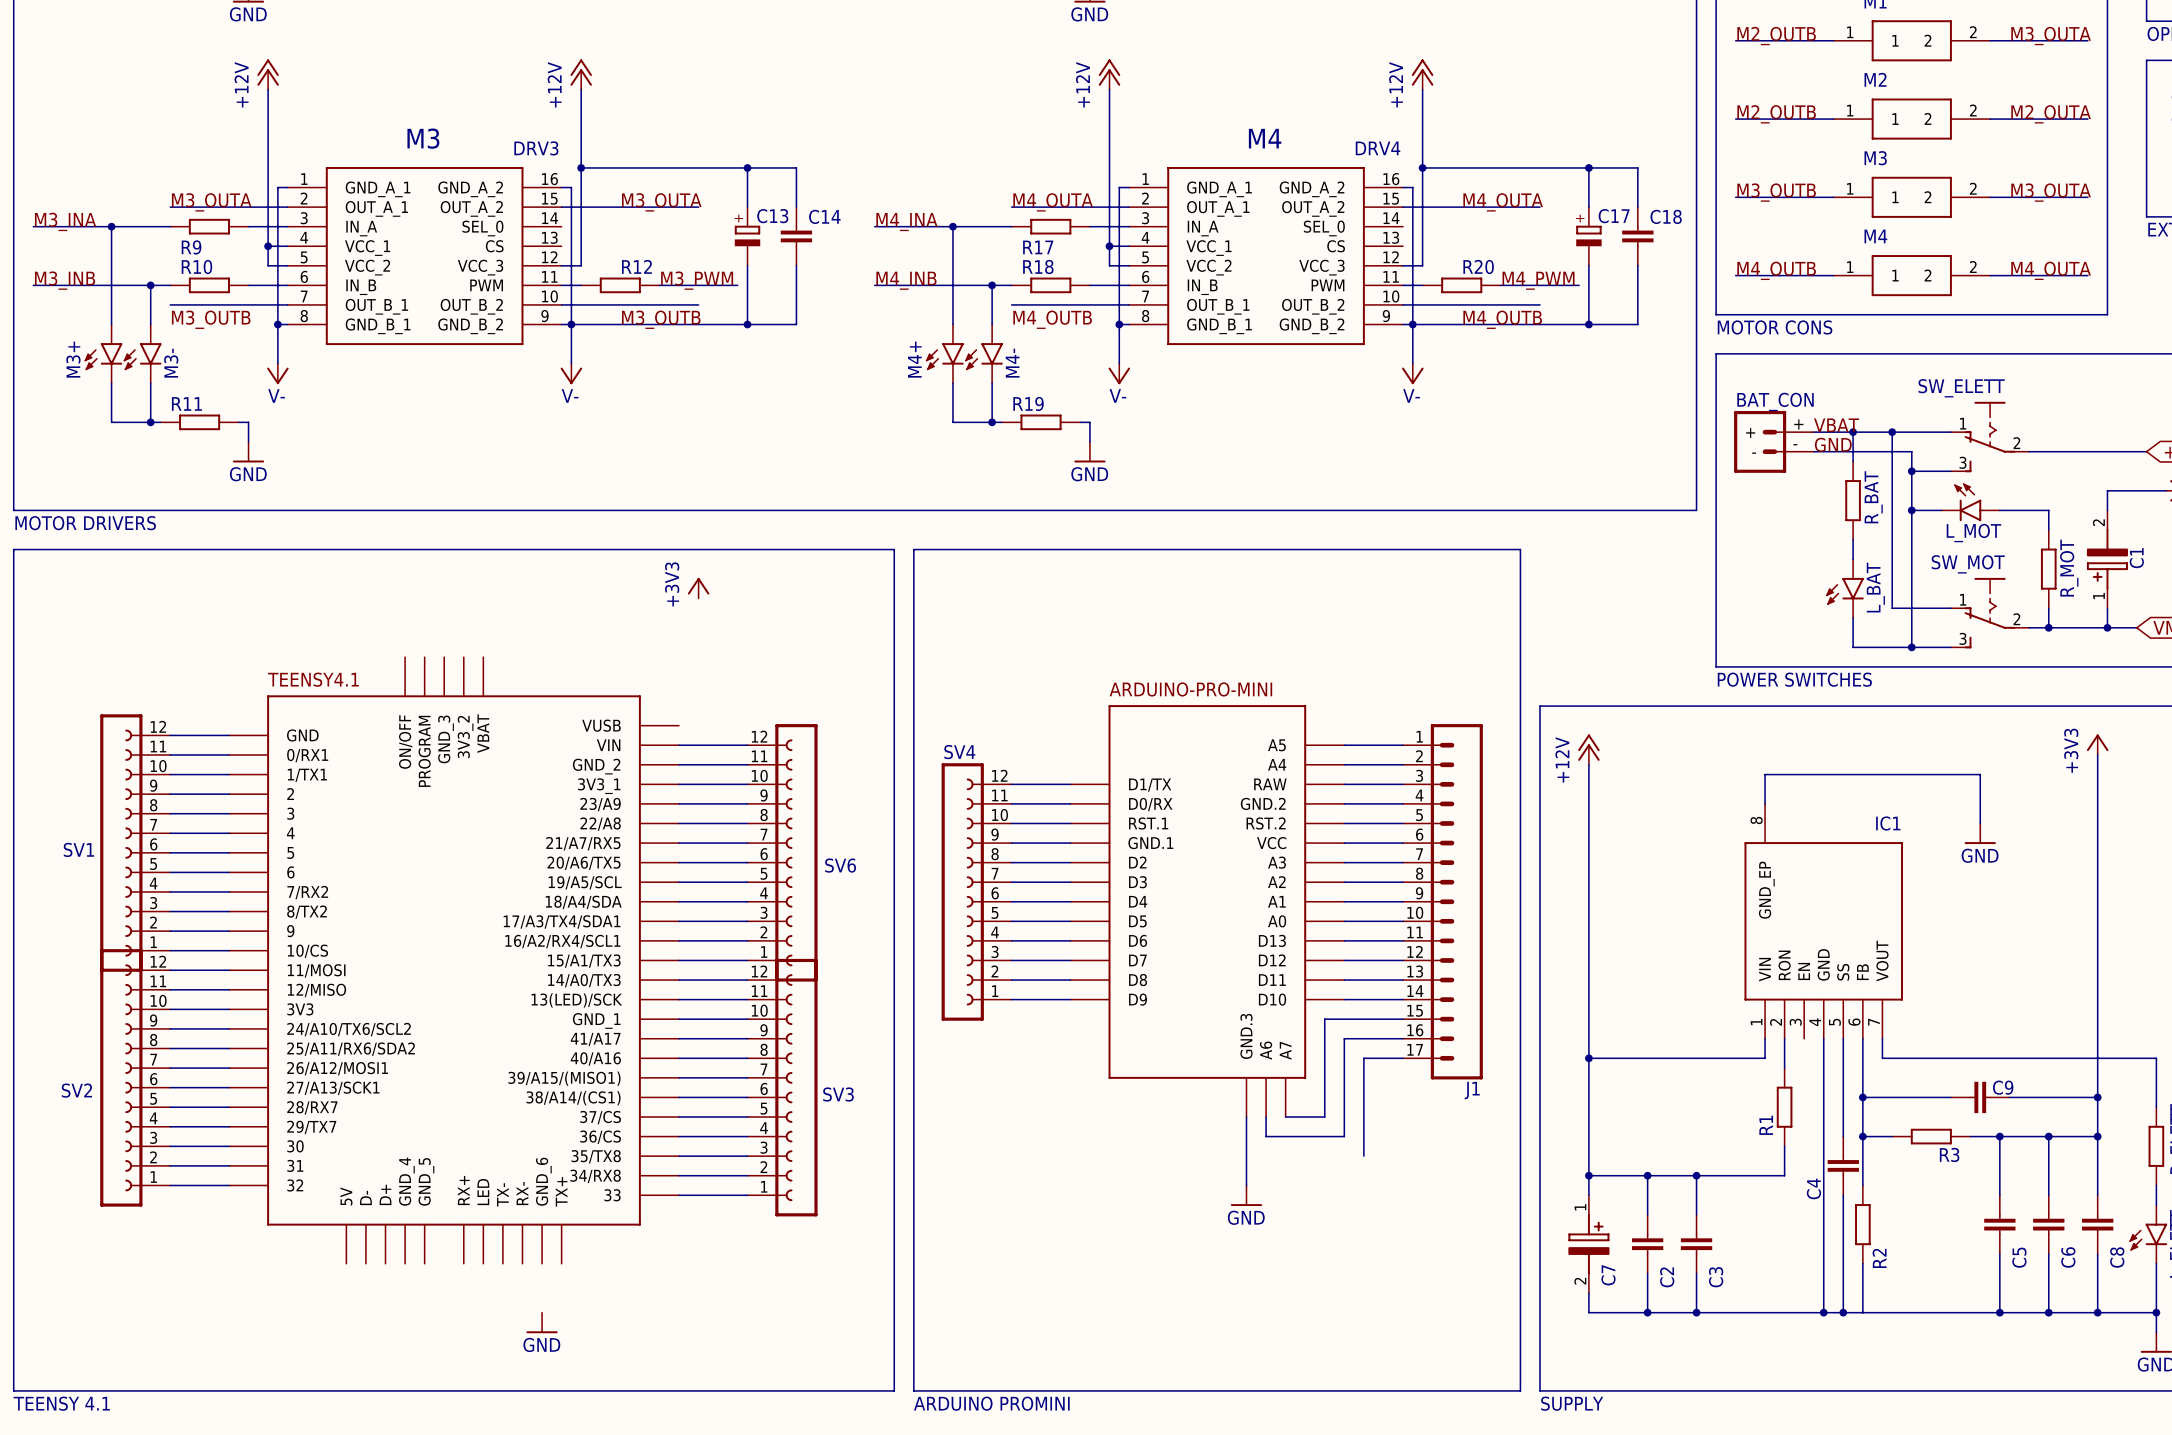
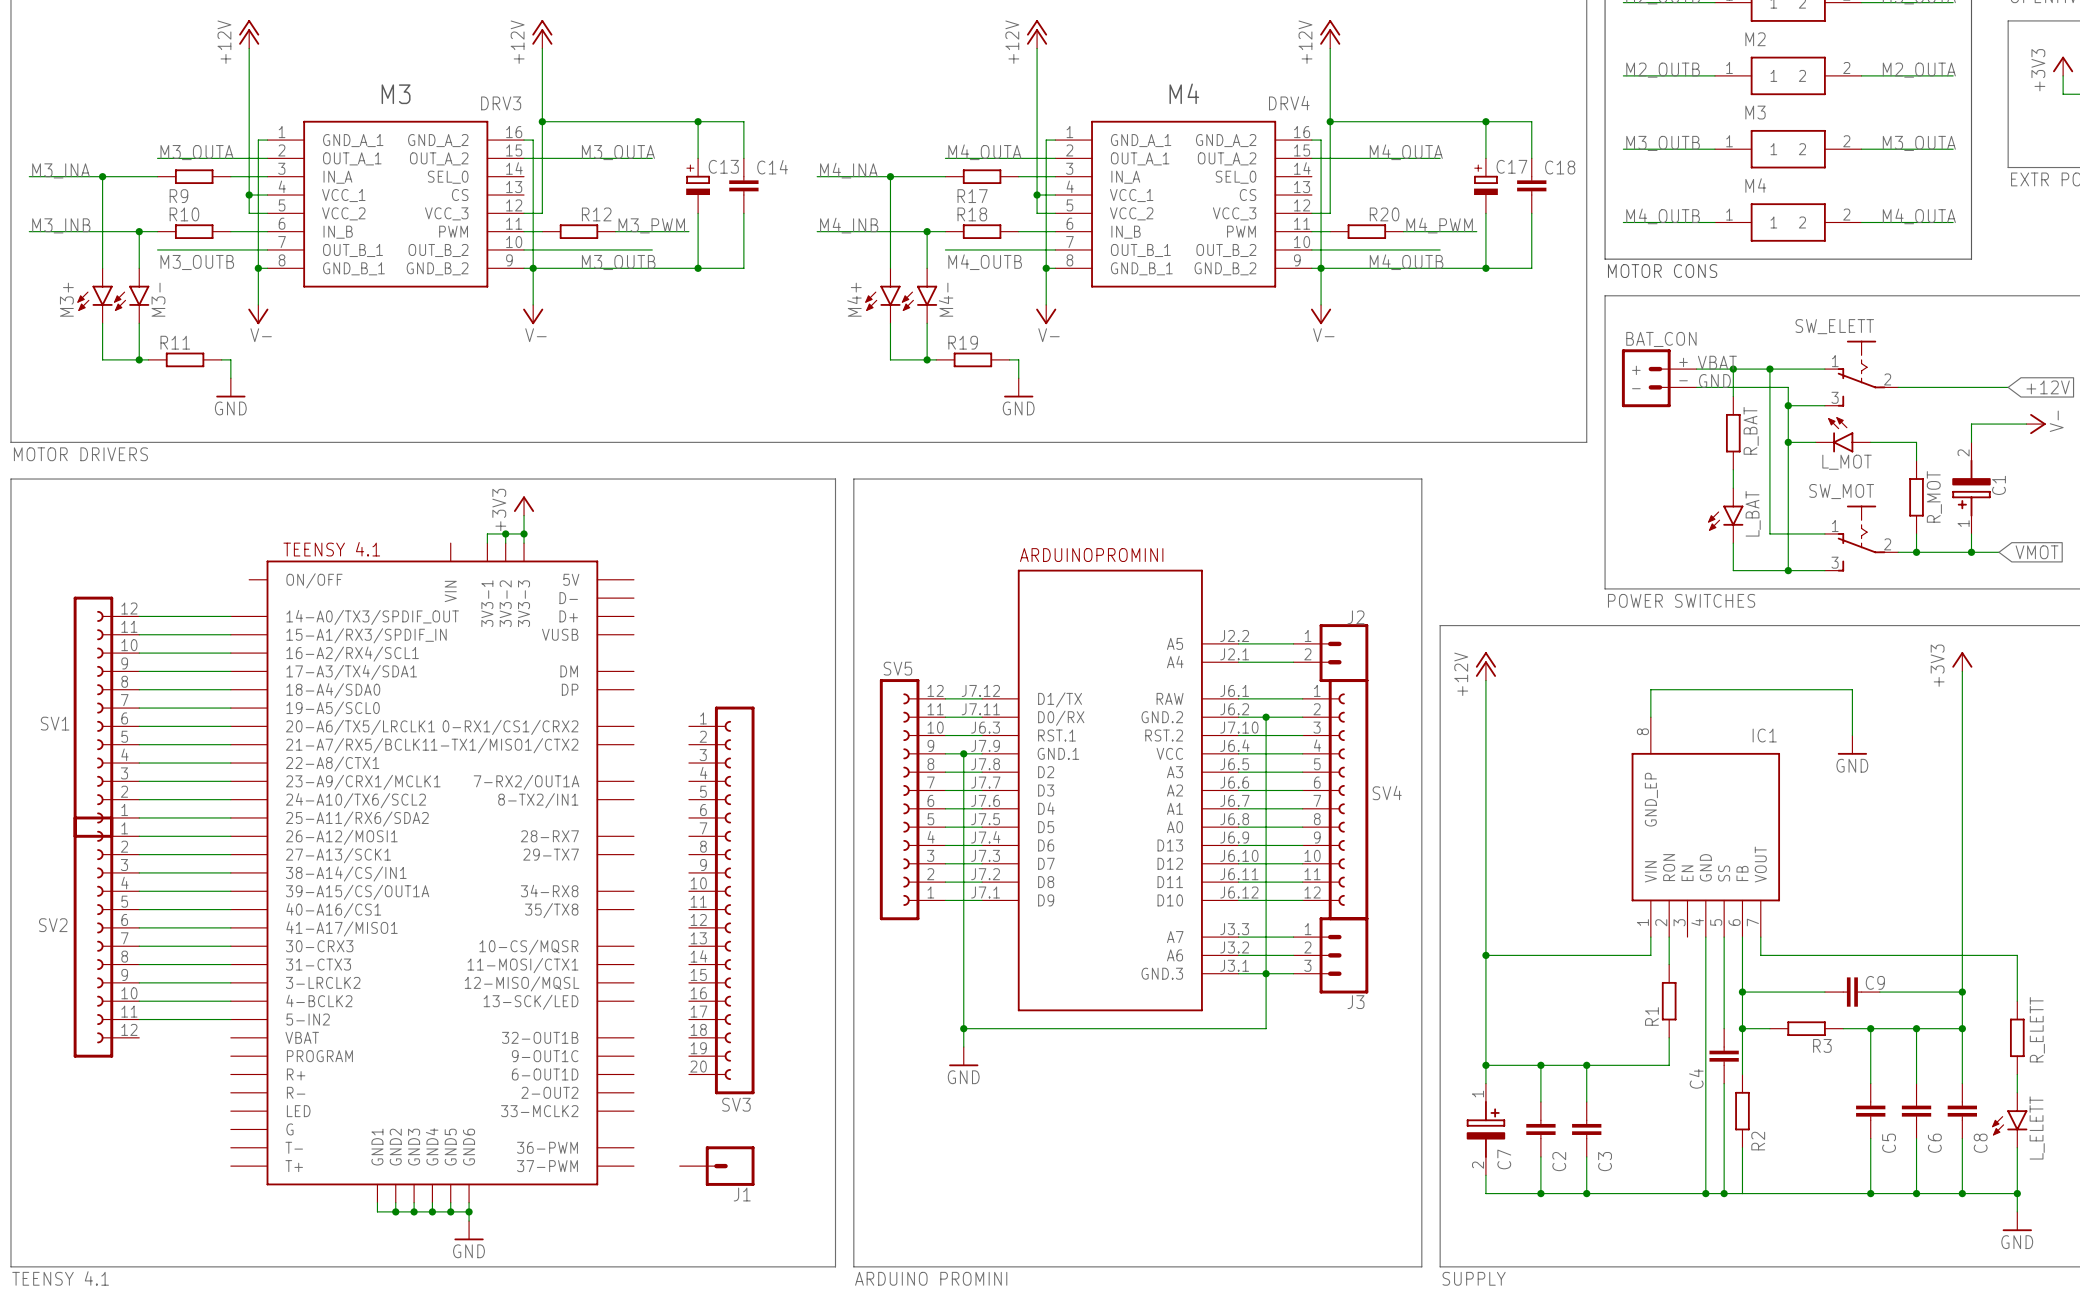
power symbol text position: +3V3 (672, 584) -> +3V3 (499, 509)
wire: none -> (524, 515) (524, 543)
power symbol position: +3V3 (698, 588) -> +3V3 (524, 506)
wire: none -> (505, 533) (505, 543)
junction: none -> (505, 533)
wire: none -> (524, 533) (487, 533) (487, 543)
junction: none -> (524, 533)
text: TEENSY4.1 (313, 679) -> none
wire: none -> (139, 616) (230, 616)
wire: none -> (139, 634) (230, 634)
J1 symbol: [1403, 724, 1483, 1080] -> [679, 1146, 755, 1186]
J2: none -> (1330, 653)
wire: (679, 745) (747, 745) -> none
SV4 name: SV4 (959, 752) -> SV5 (897, 668)
wire: (679, 764) (747, 764) -> none
wire: (1344, 764) (1403, 764) -> (1238, 643) (1293, 643)
wire: (679, 784) (747, 784) -> none
wire: (679, 803) (747, 803) -> none
wire: none -> (1266, 717) (1266, 1028) (1256, 1028)
junction: none -> (1266, 717)
wire: (679, 823) (747, 823) -> none
SV1 position: (135, 843) -> (106, 717)
wire: (679, 843) (747, 843) -> none
wire: none -> (963, 753) (963, 1047)
junction: none -> (963, 753)
SV6: (782, 852) -> none
wire: (679, 862) (747, 862) -> none
wire: (679, 882) (747, 882) -> none
ARDUINOPROMINI: none -> (1110, 790)
SV4: none -> (1335, 799)
wire: (679, 901) (747, 901) -> none
part: ARDUINO-PRO-MINI (1207, 911) -> none
wire: (679, 921) (747, 921) -> none
wire: (679, 940) (747, 940) -> none
SV3 symbol: [747, 958, 818, 1217] -> [688, 706, 755, 1095]
part: (454, 960) -> none
wire: (679, 960) (747, 960) -> none
part: none -> (432, 872)
wire: (679, 980) (747, 980) -> none
wire: (679, 999) (747, 999) -> none
wire: (679, 1019) (747, 1019) -> none
wire: (1403, 1019) (1324, 1019) (1324, 1117) (1285, 1117) -> none
wire: (679, 1038) (747, 1038) -> none
wire: (1344, 1038) (1344, 1136) -> (1256, 937) (1238, 937)
wire: (679, 1058) (747, 1058) -> none
wire: (1363, 1058) (1363, 1156) -> (1275, 955) (1238, 955)
J3: none -> (1330, 955)
SV2 flip: as is (121, 1077) -> up-down (93, 937)
wire: (679, 1077) (747, 1077) -> none
wire: none -> (1238, 973) (1293, 973)
junction: none -> (1266, 973)
J1 name position: J1 (1472, 1090) -> J1 (742, 1194)
SV3 name position: SV3 (838, 1094) -> SV3 (736, 1104)
wire: (679, 1097) (747, 1097) -> none
wire: (679, 1117) (747, 1117) -> none
wire: (1246, 1117) (1246, 1185) -> none
wire: (1266, 1117) (1266, 1136) -> (963, 1028) (1183, 1028)
wire: (679, 1136) (747, 1136) -> none
junction: none -> (963, 1028)
wire: (170, 1146) (228, 1146) -> none
wire: (679, 1156) (747, 1156) -> none
wire: (170, 1165) (228, 1165) -> none
power symbol: none -> GND (963, 1056)
wire: (679, 1175) (747, 1175) -> none
wire: (170, 1185) (228, 1185) -> none
wire: (679, 1195) (747, 1195) -> none
power symbol: GND (1246, 1195) -> none
wire: none -> (377, 1202) (377, 1211) (469, 1211)
wire: none -> (395, 1202) (395, 1211)
wire: none -> (414, 1202) (414, 1211)
wire: none -> (432, 1202) (432, 1211)
wire: none -> (450, 1202) (450, 1211)
wire: none -> (469, 1202) (469, 1221)
power symbol position: GND (542, 1322) -> GND (469, 1230)
junction: none -> (395, 1211)
junction: none -> (414, 1211)
junction: none -> (432, 1211)
junction: none -> (450, 1211)
junction: none -> (469, 1211)

